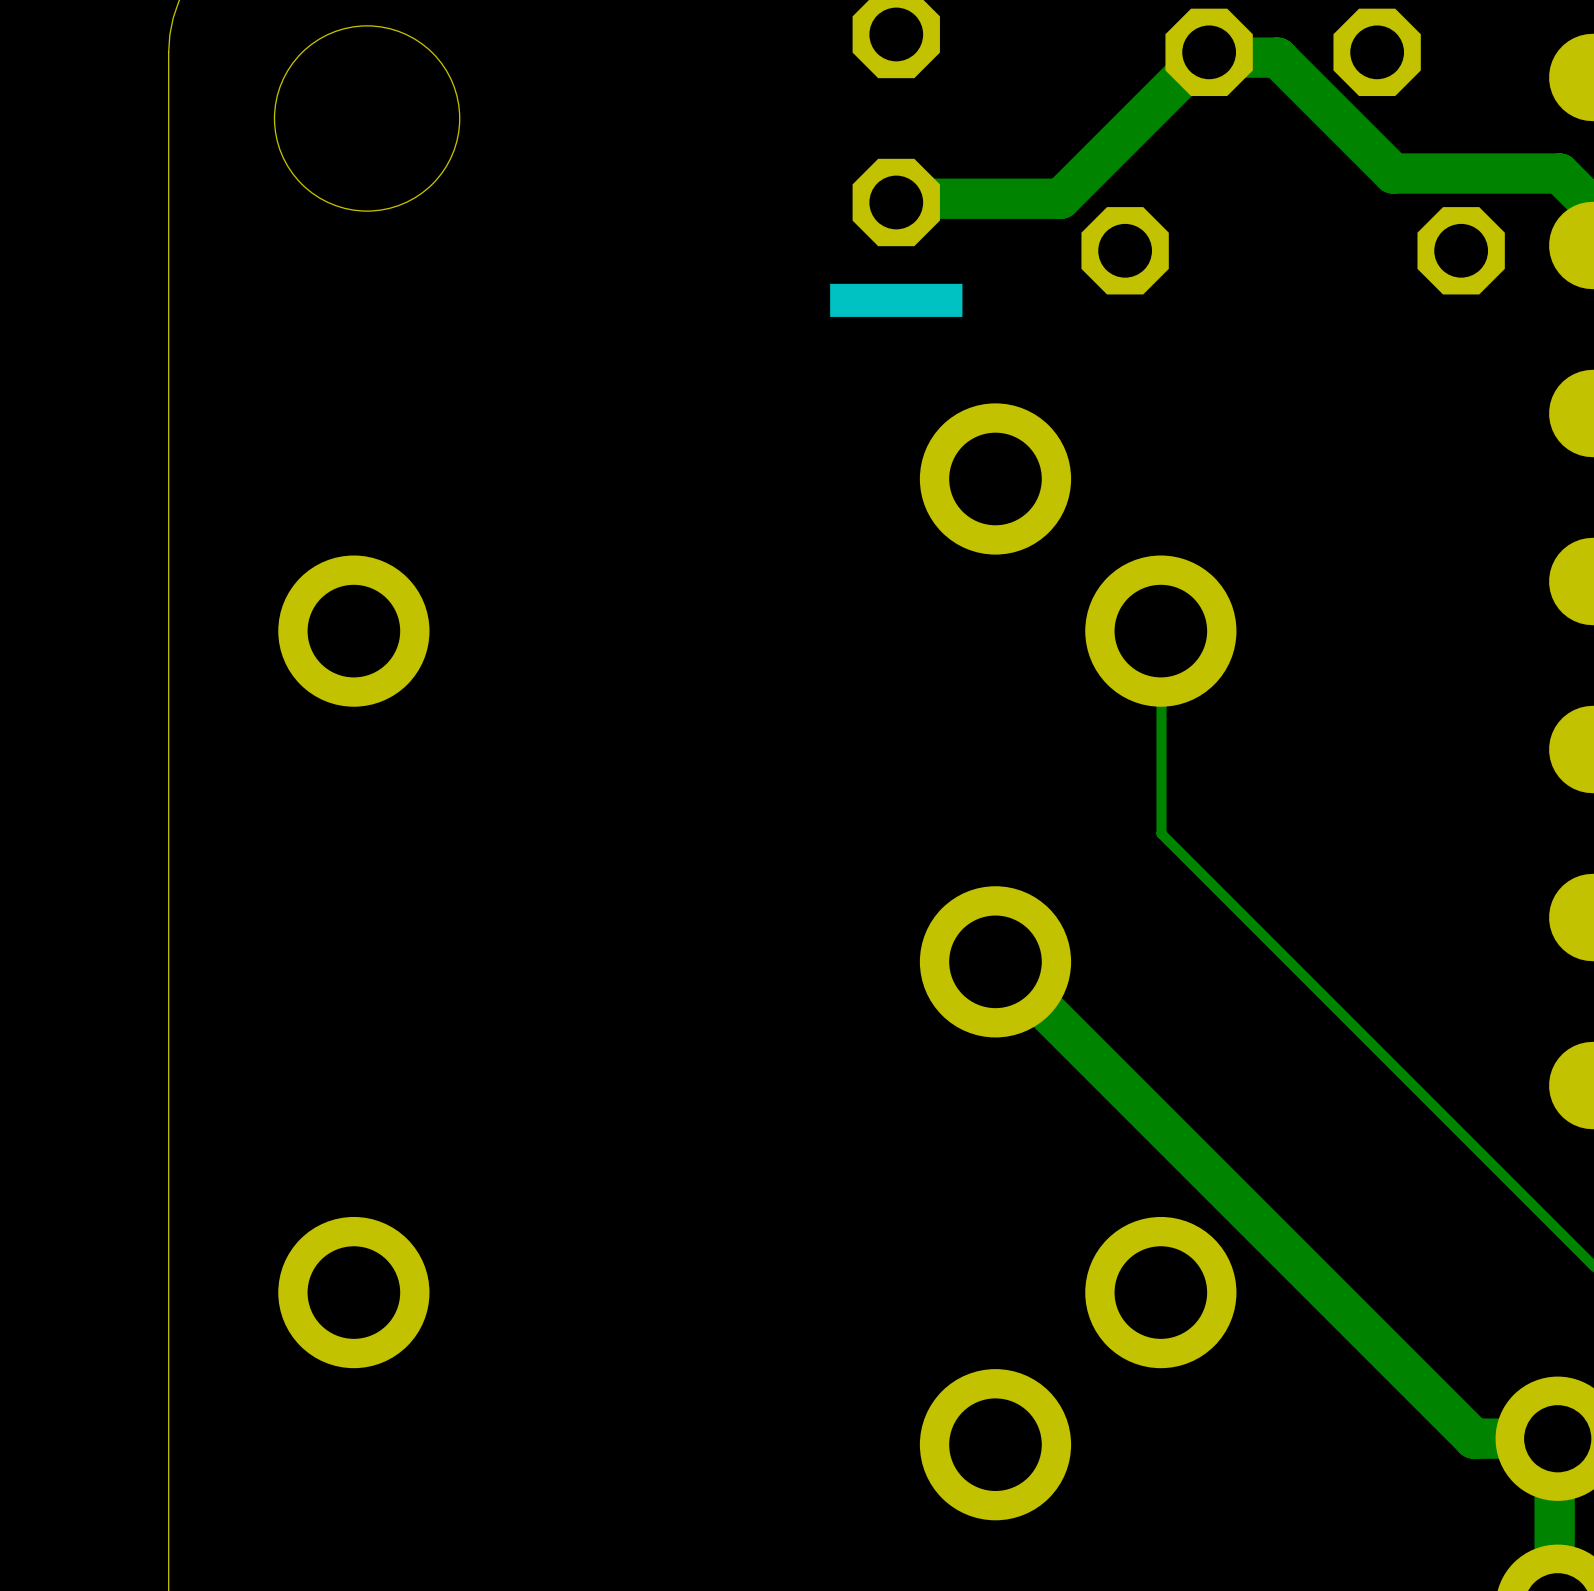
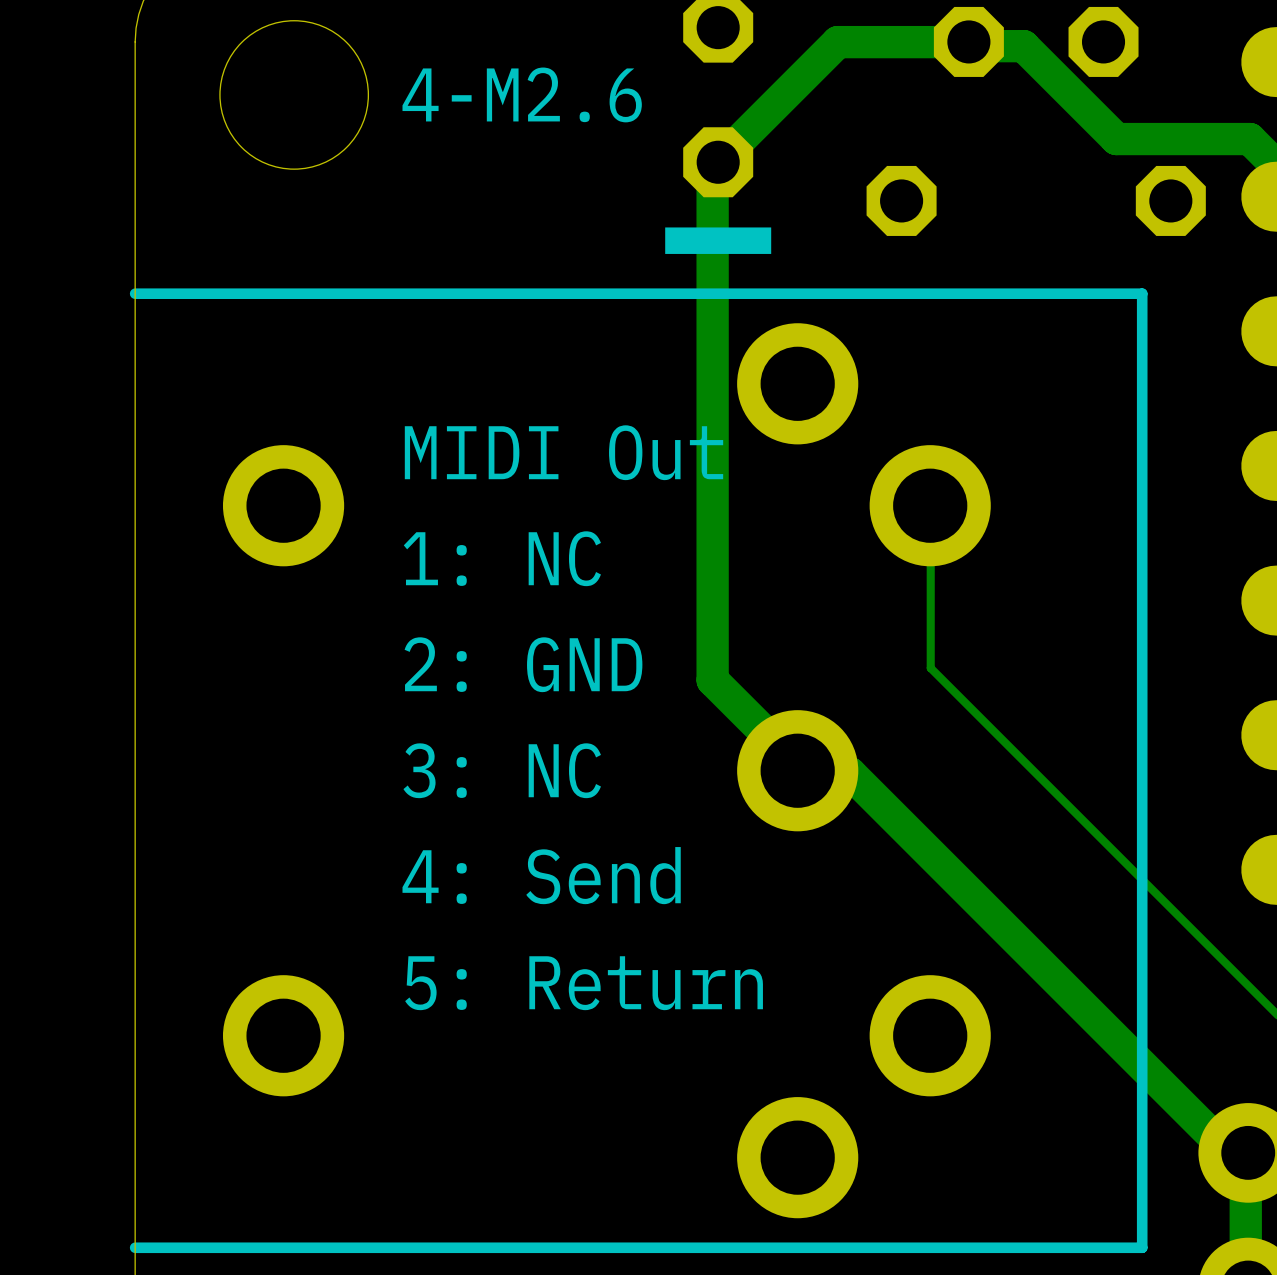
track: (1206, 52) (1060, 198) (899, 198) -> (967, 42) (837, 42) (720, 159)
text: none -> 4-M2.6 (522, 94)
track: none -> (718, 162) (712, 175) (712, 680) (789, 756) (797, 770)
line: none -> (135, 293) (1142, 293) (1142, 1247) (135, 1247)
text: none -> MIDI Out (563, 452)
text: none -> 1: NC (502, 558)
text: none -> 2: GND (523, 664)
text: none -> 3: NC (502, 770)
track: (1000, 964) (1473, 1438) (1534, 1438) -> (801, 773) (849, 773) (1229, 1152)
text: none -> 4: Send (541, 875)
text: none -> 5: Return (584, 983)

